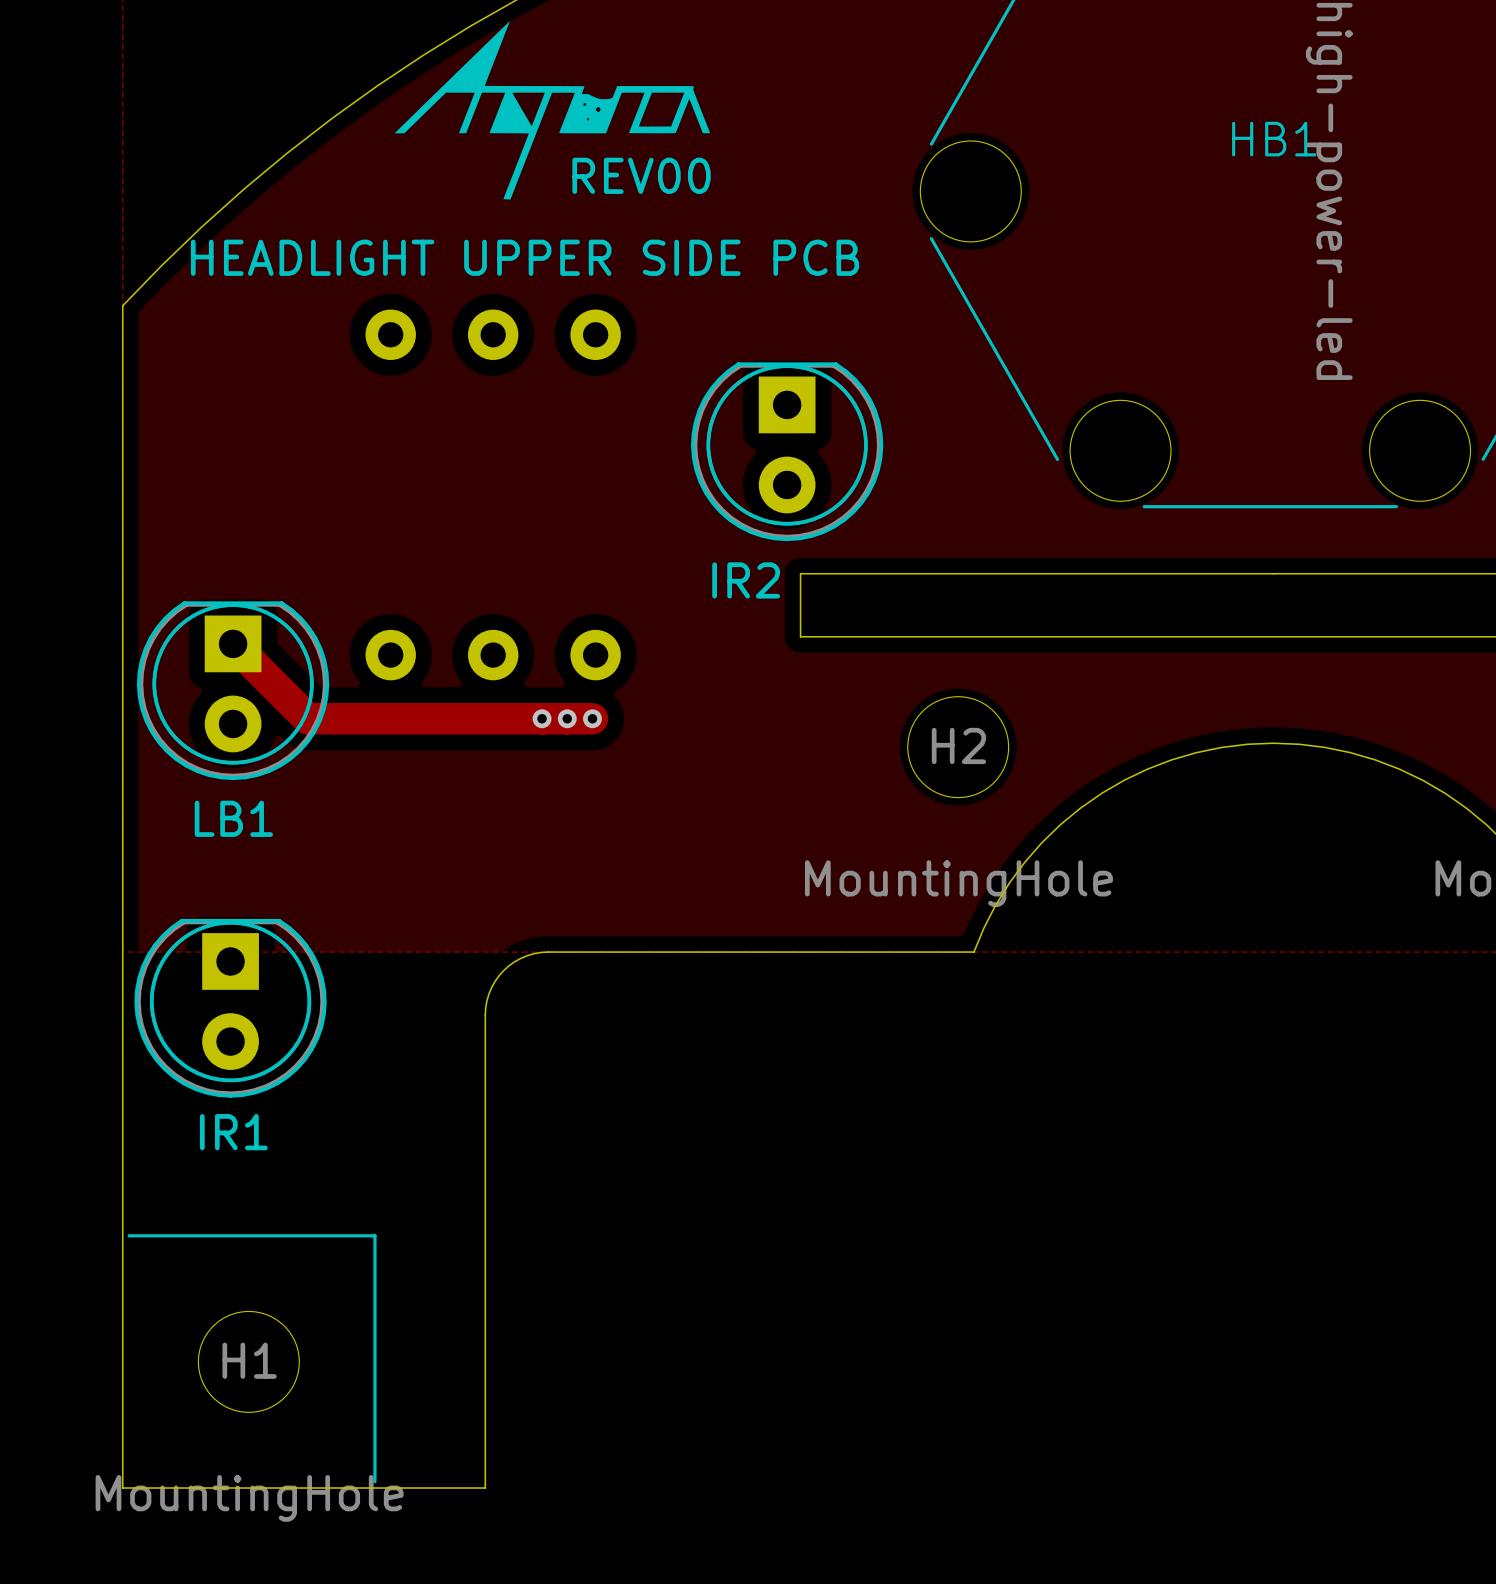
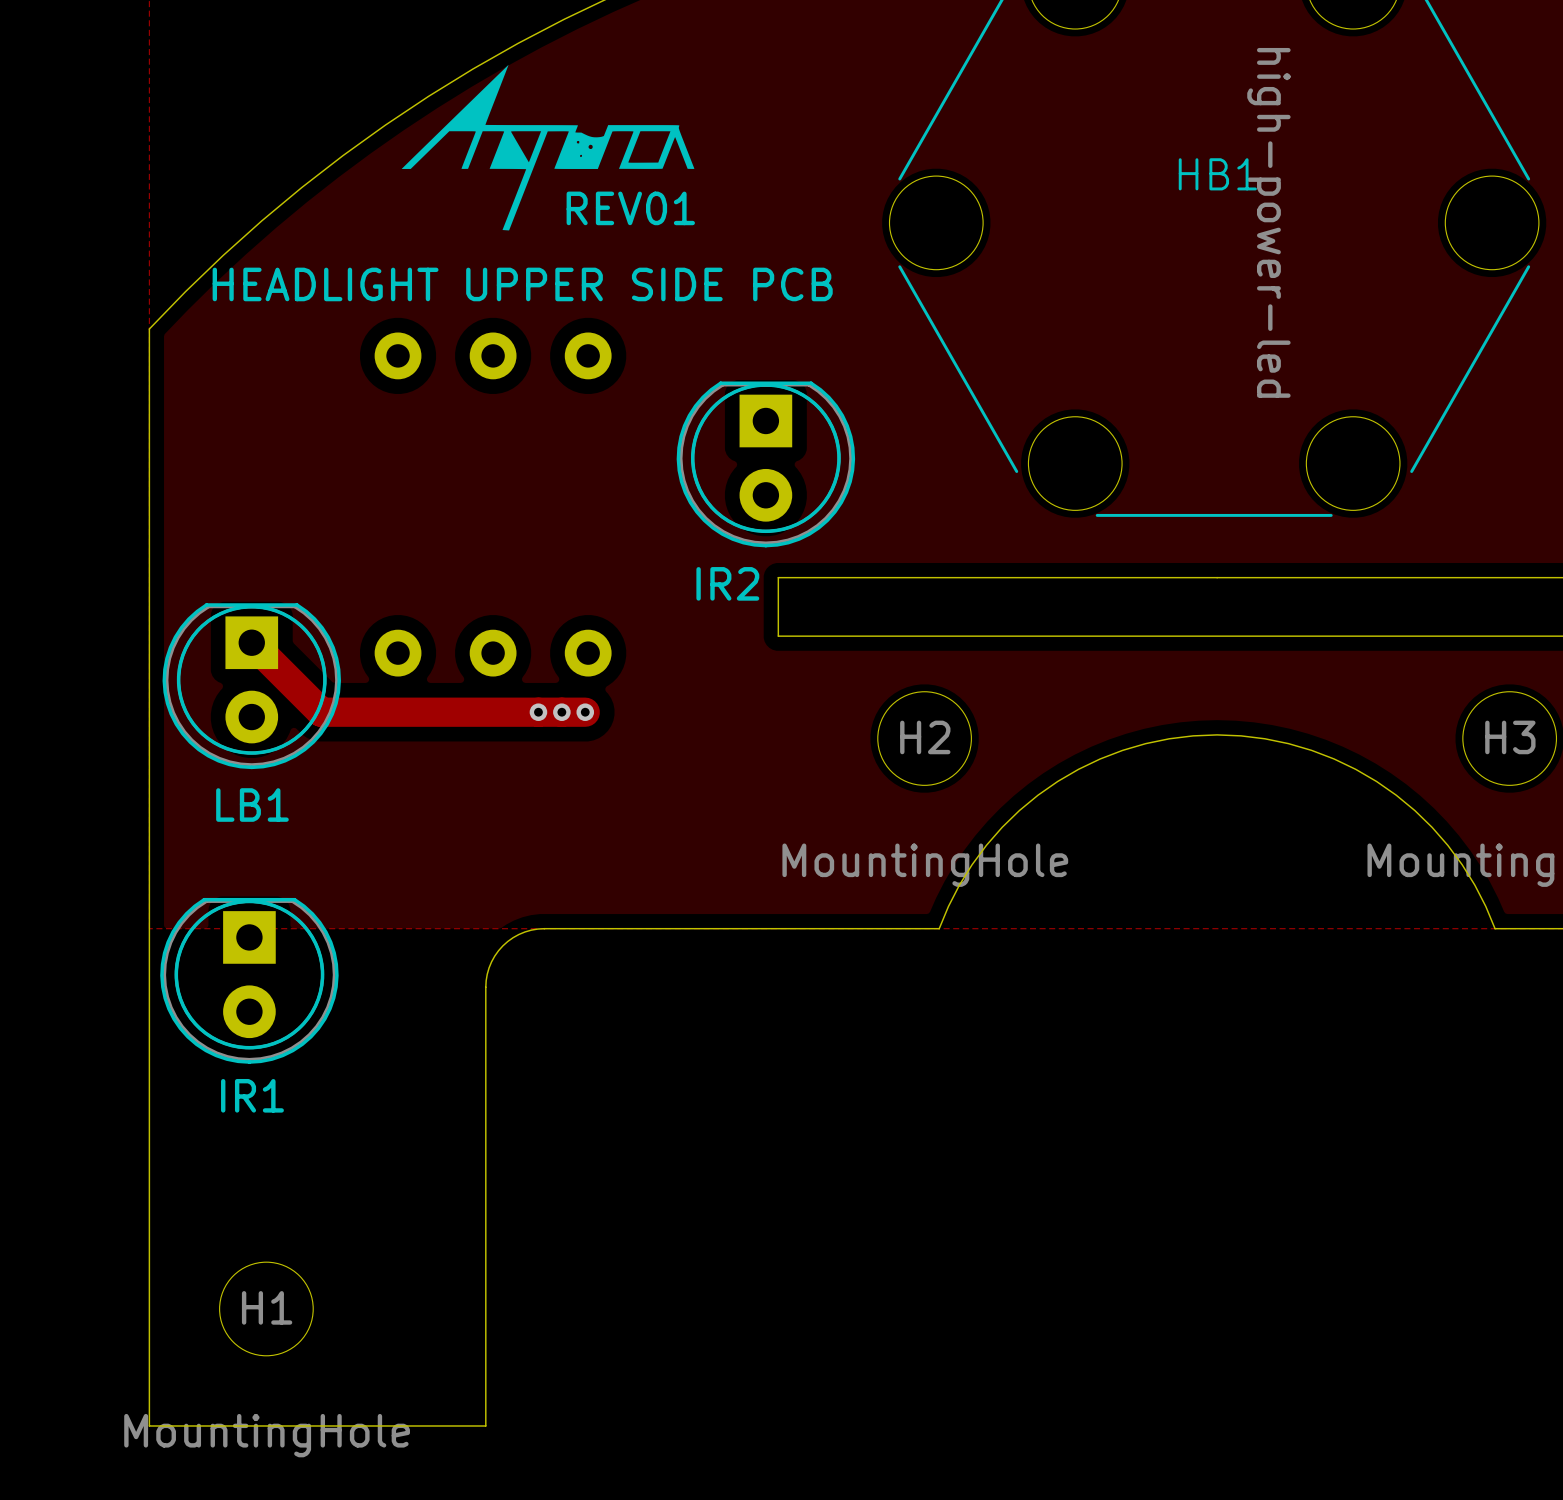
text: REV00 (641, 175) -> REV01 (630, 208)
line: (129, 1235) (374, 1235) (374, 1481) -> none

